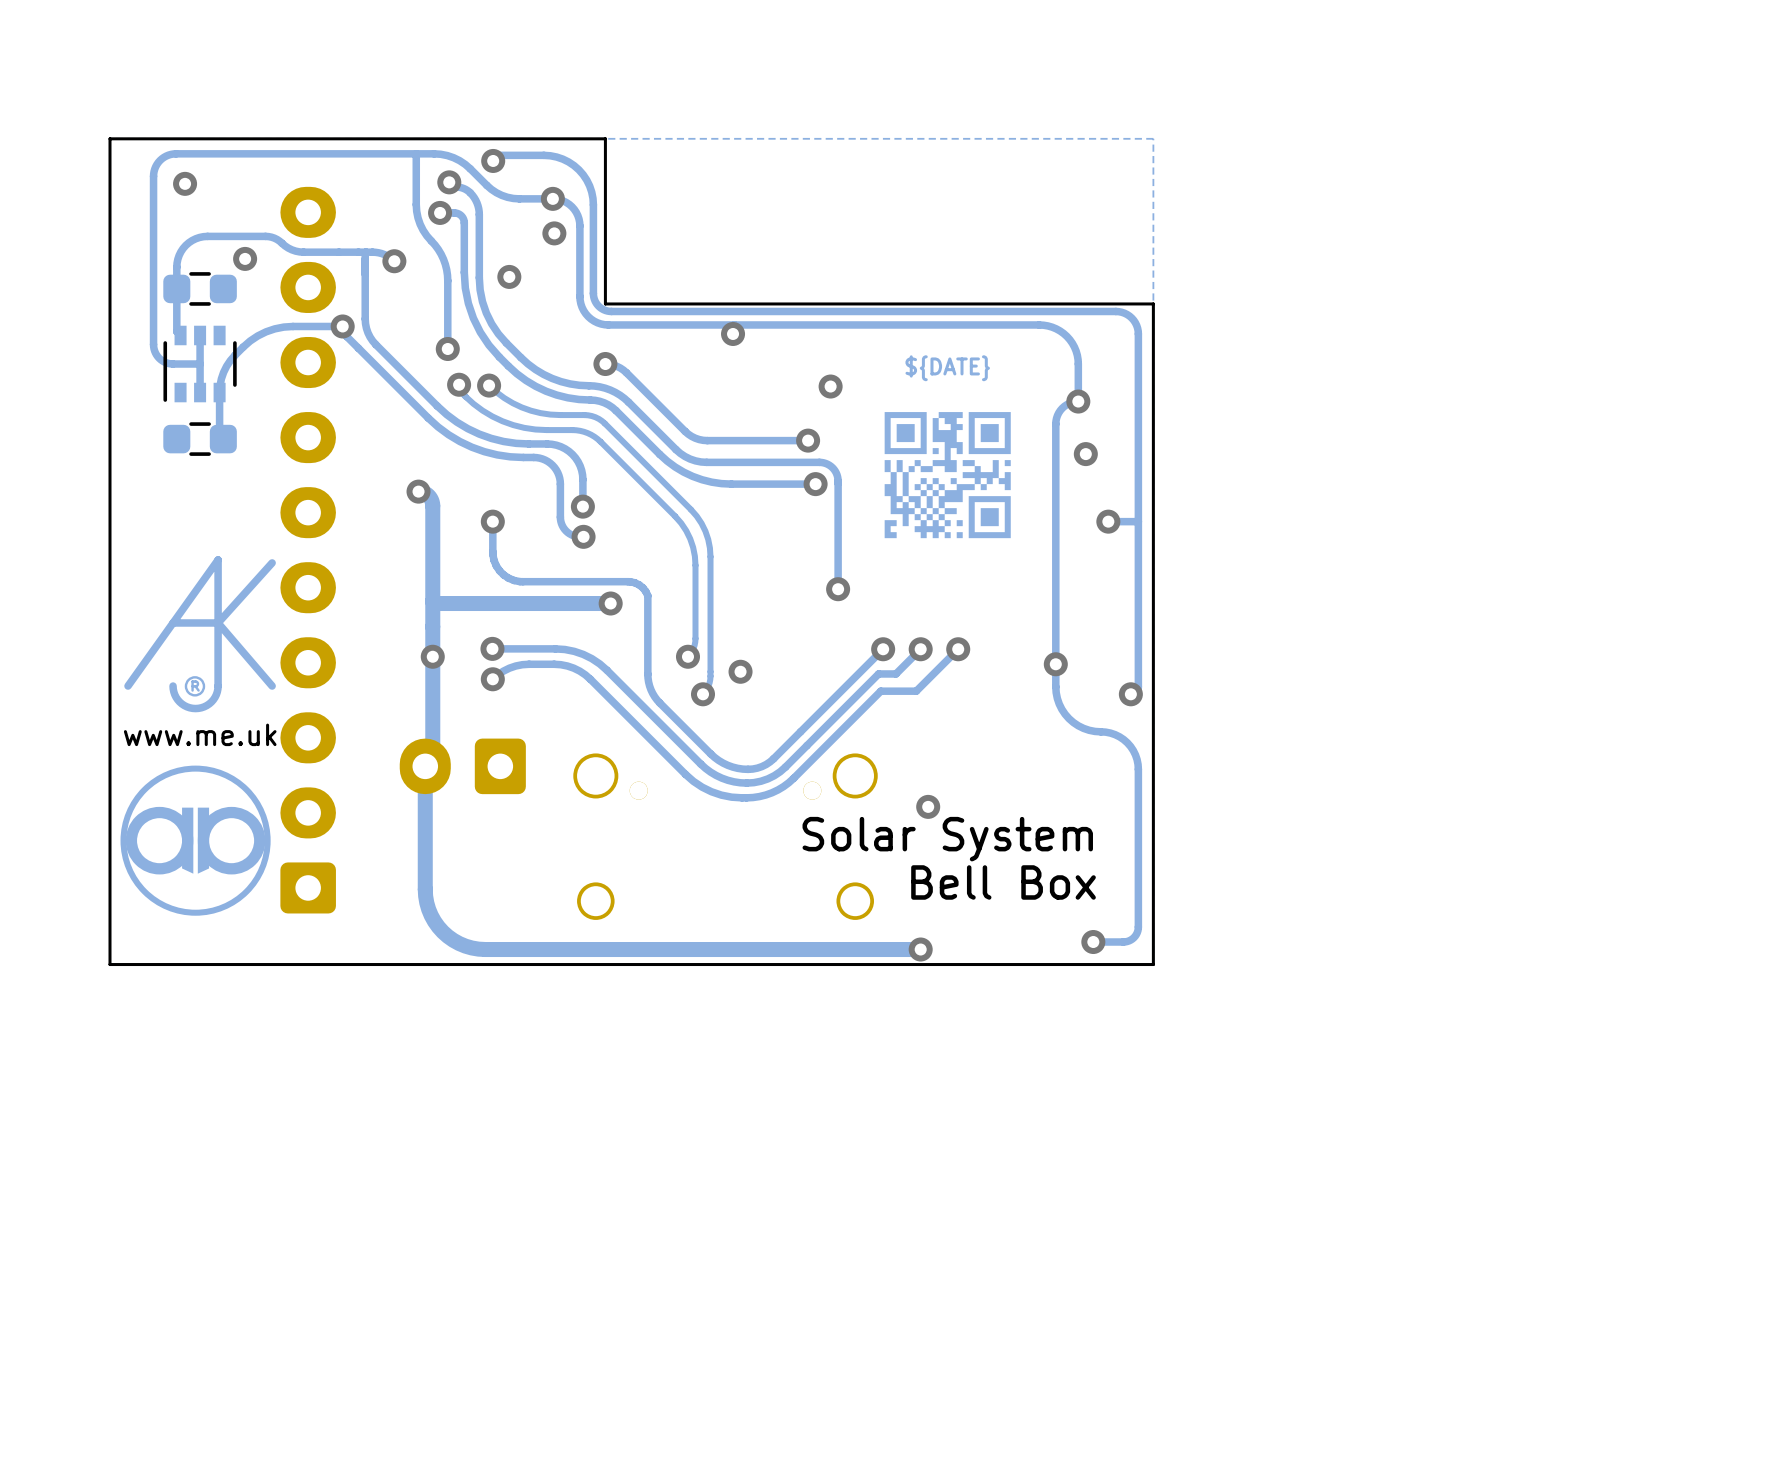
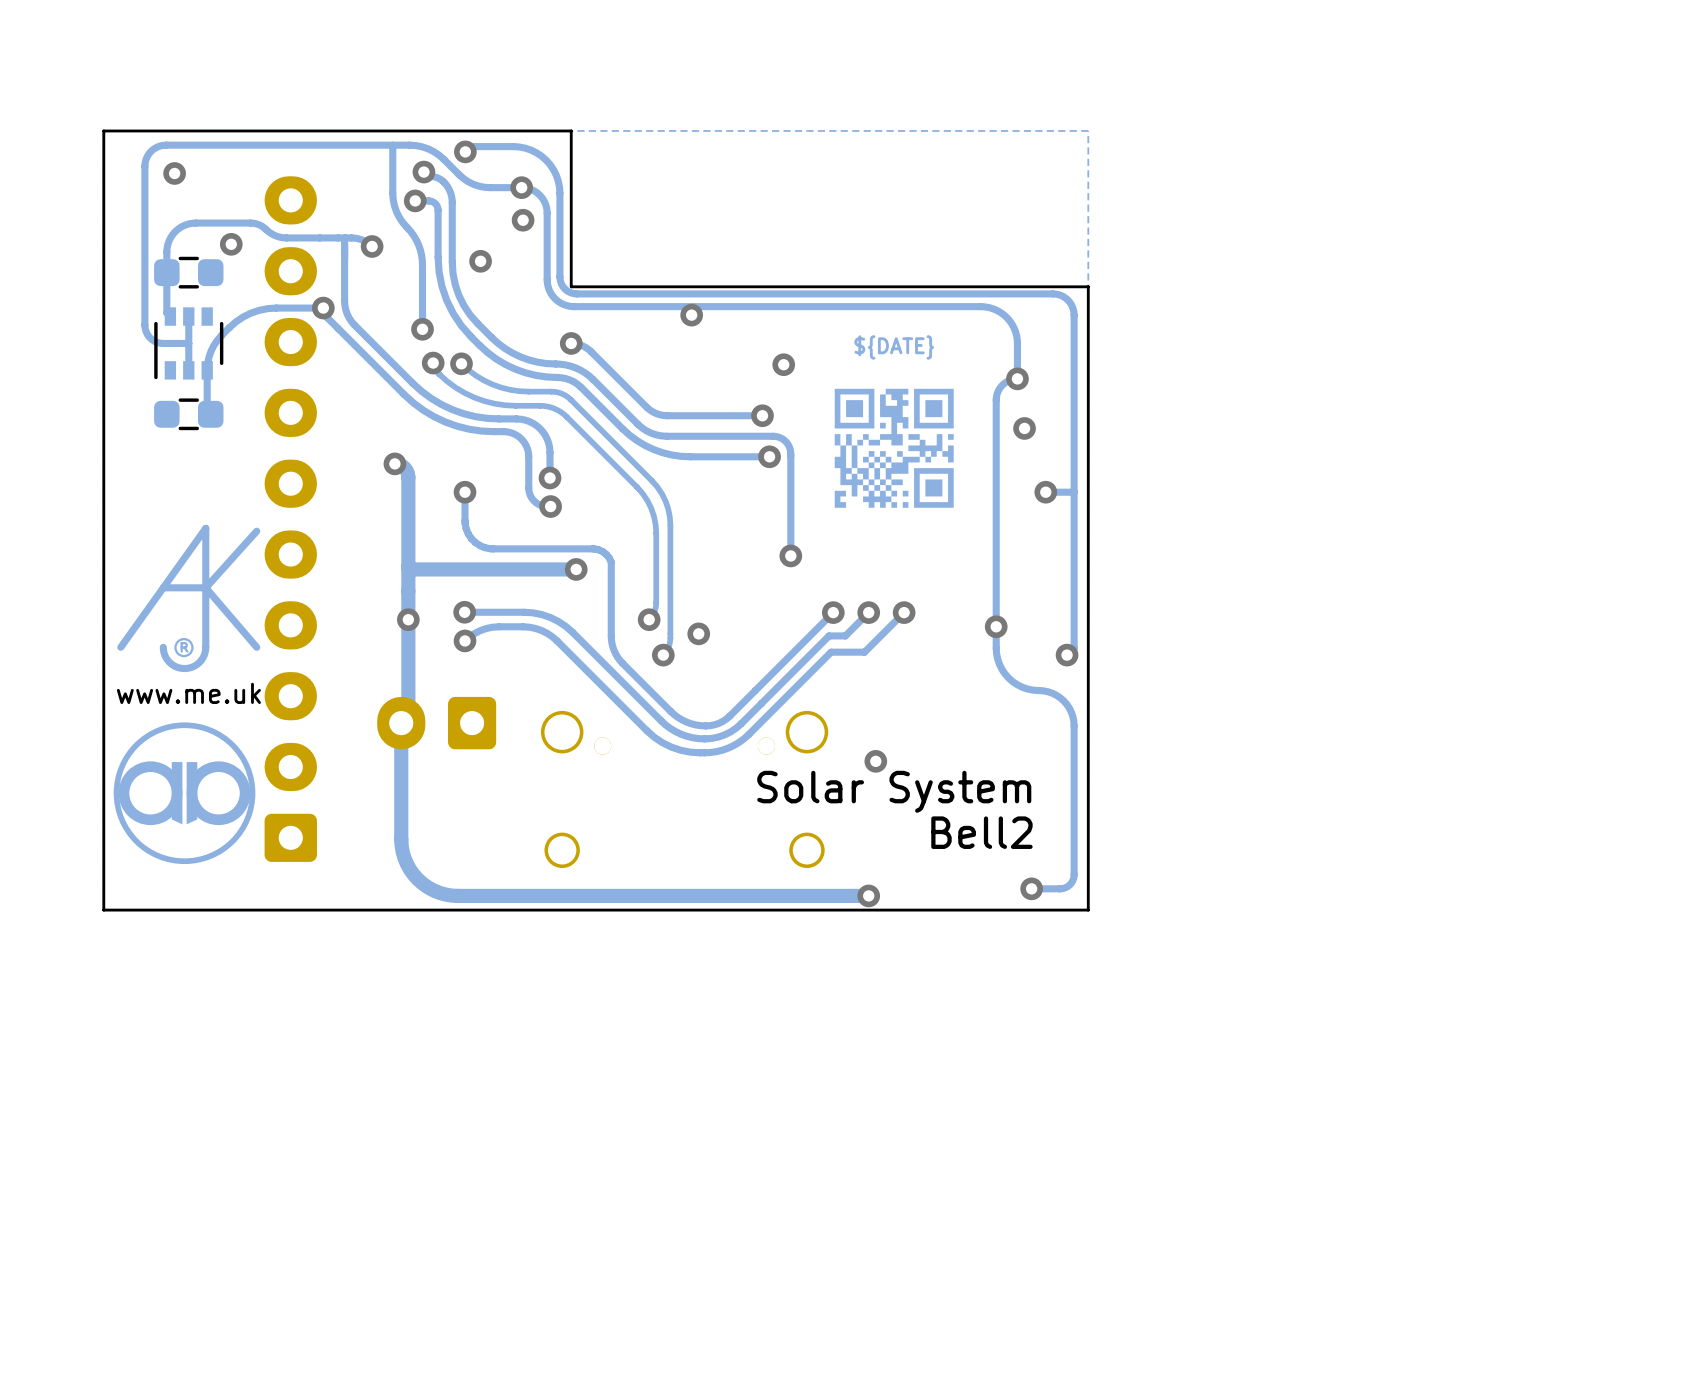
text: Bell Box (1003, 882) -> Bell2 (981, 832)

